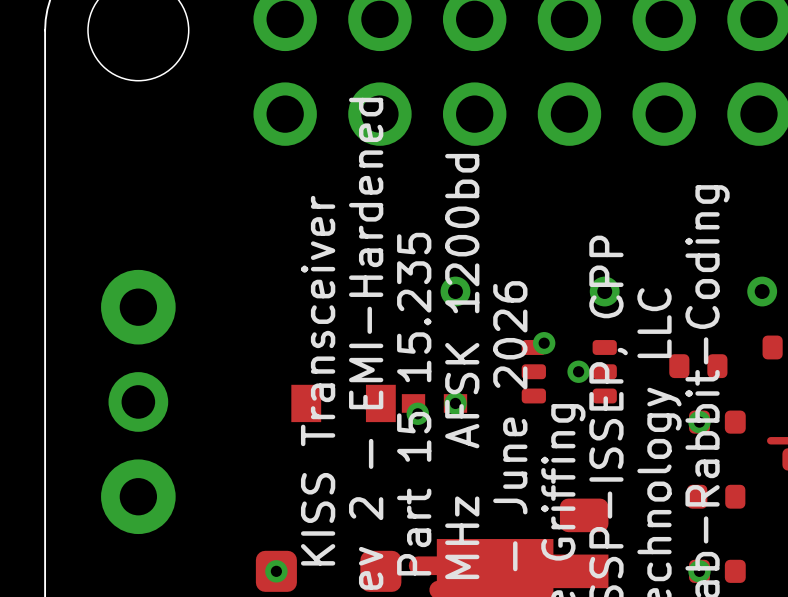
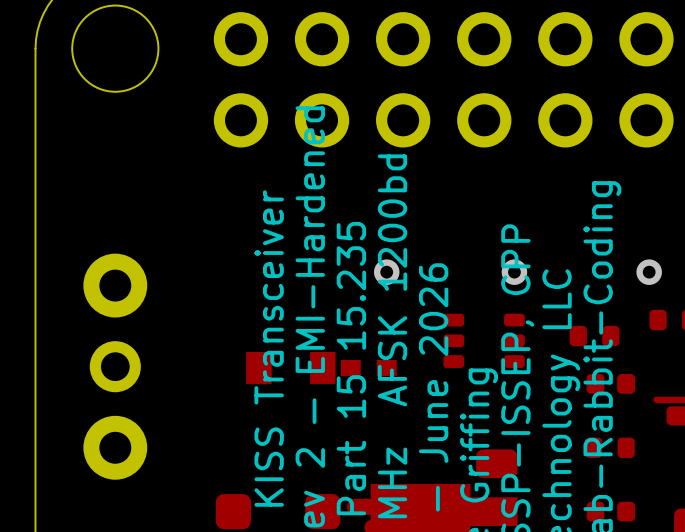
via: (544, 343) -> none
via: (578, 371) -> none
via: (455, 403) -> none
via: (417, 413) -> none
via: (699, 422) -> none
via: (276, 571) -> none
via: (699, 571) -> none

